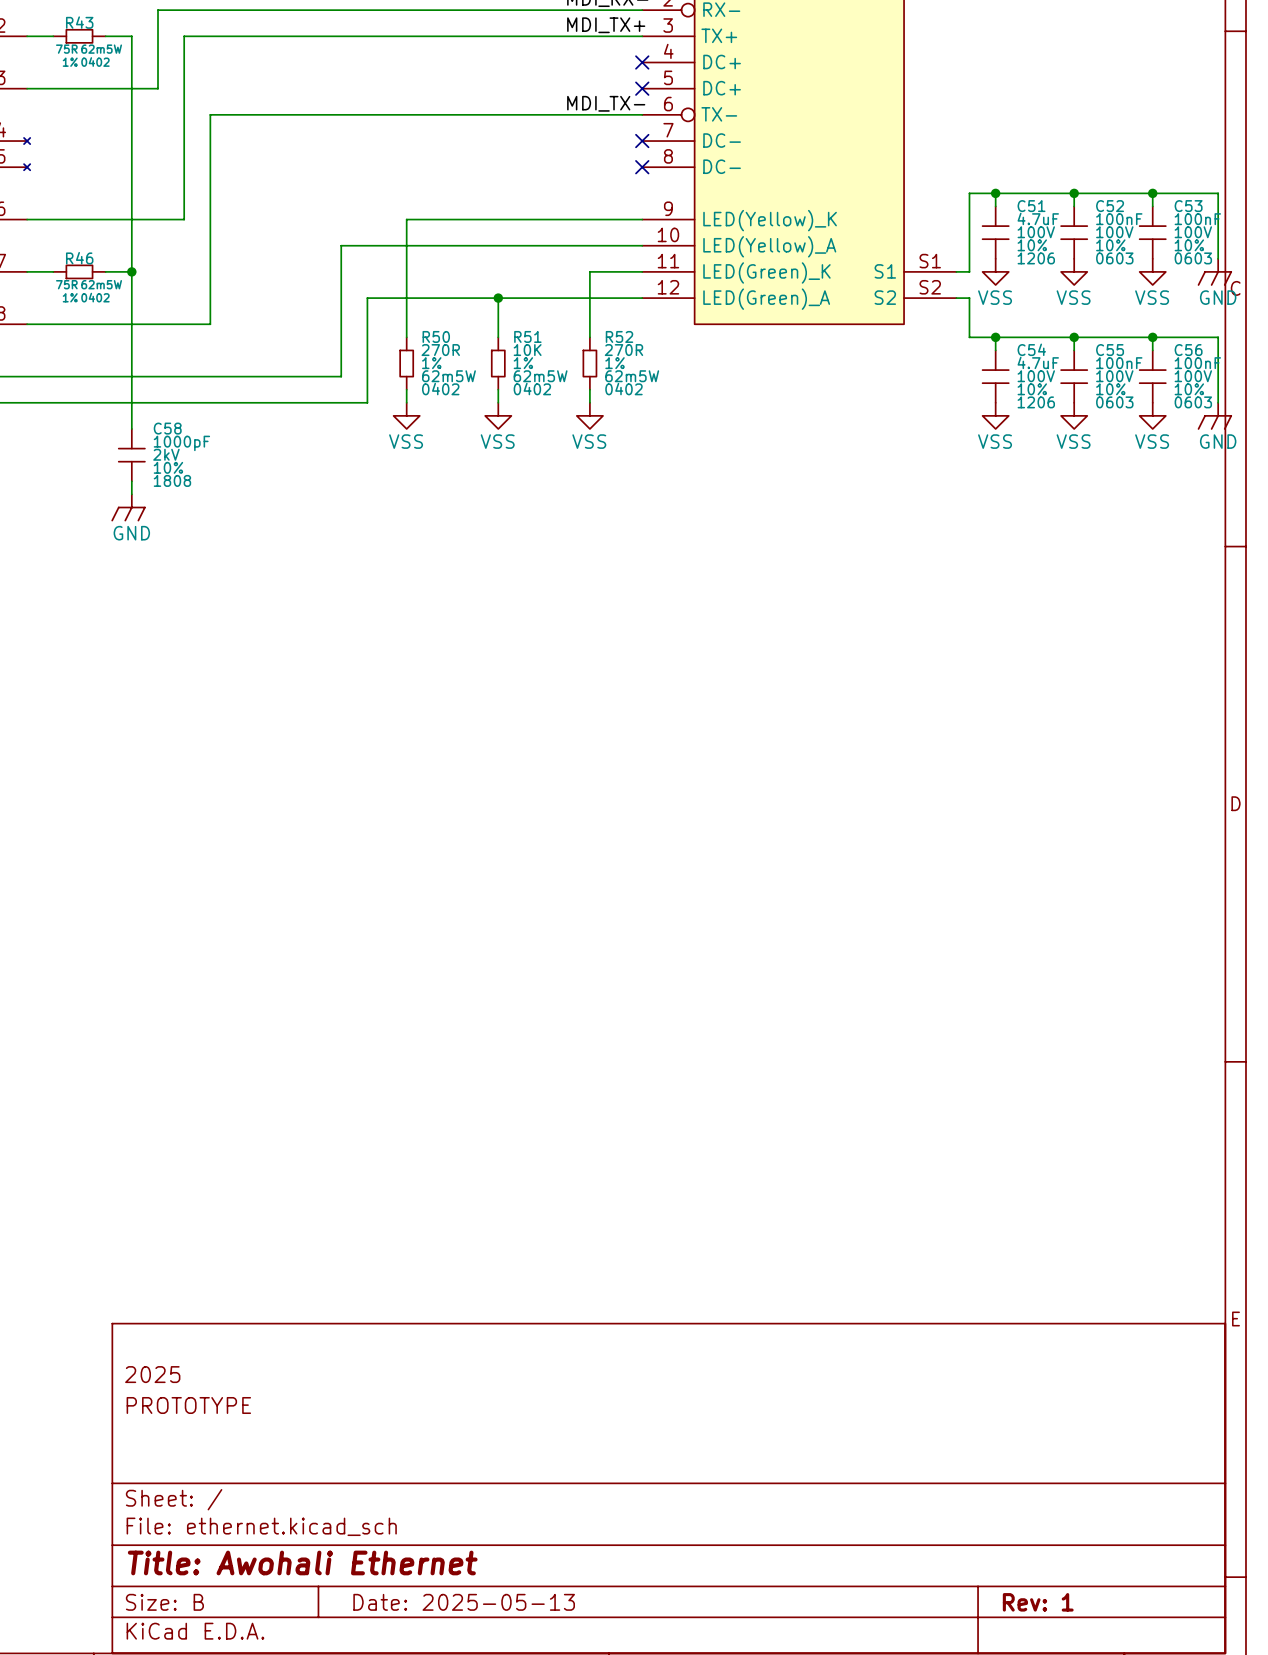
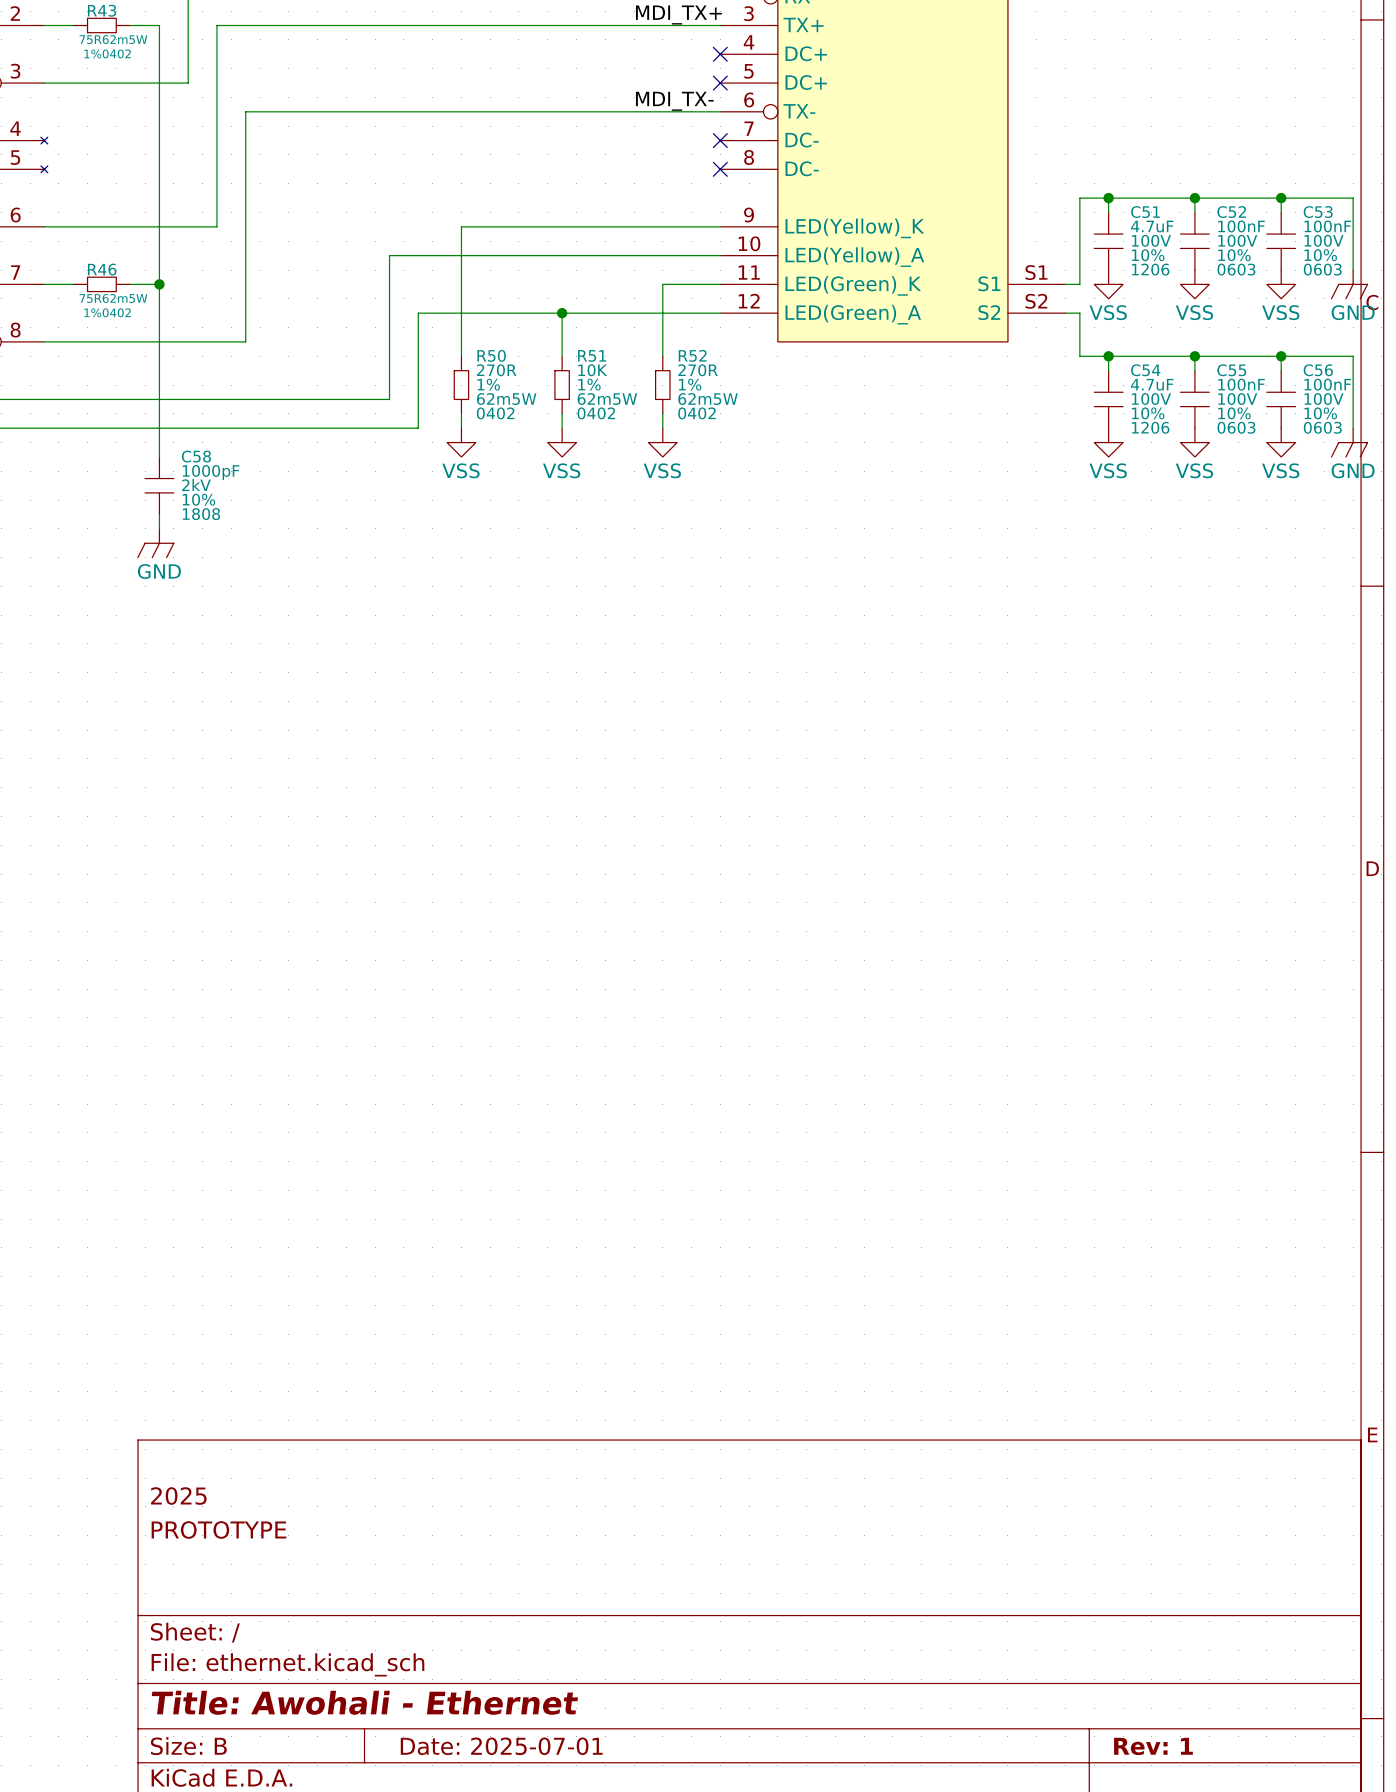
title block: Title: Awohali Ethernet (302, 1562) -> Title: Awohali - Ethernet (364, 1702)
title block: Date: 2025-05-13 (464, 1602) -> Date: 2025-07-01 (501, 1746)

